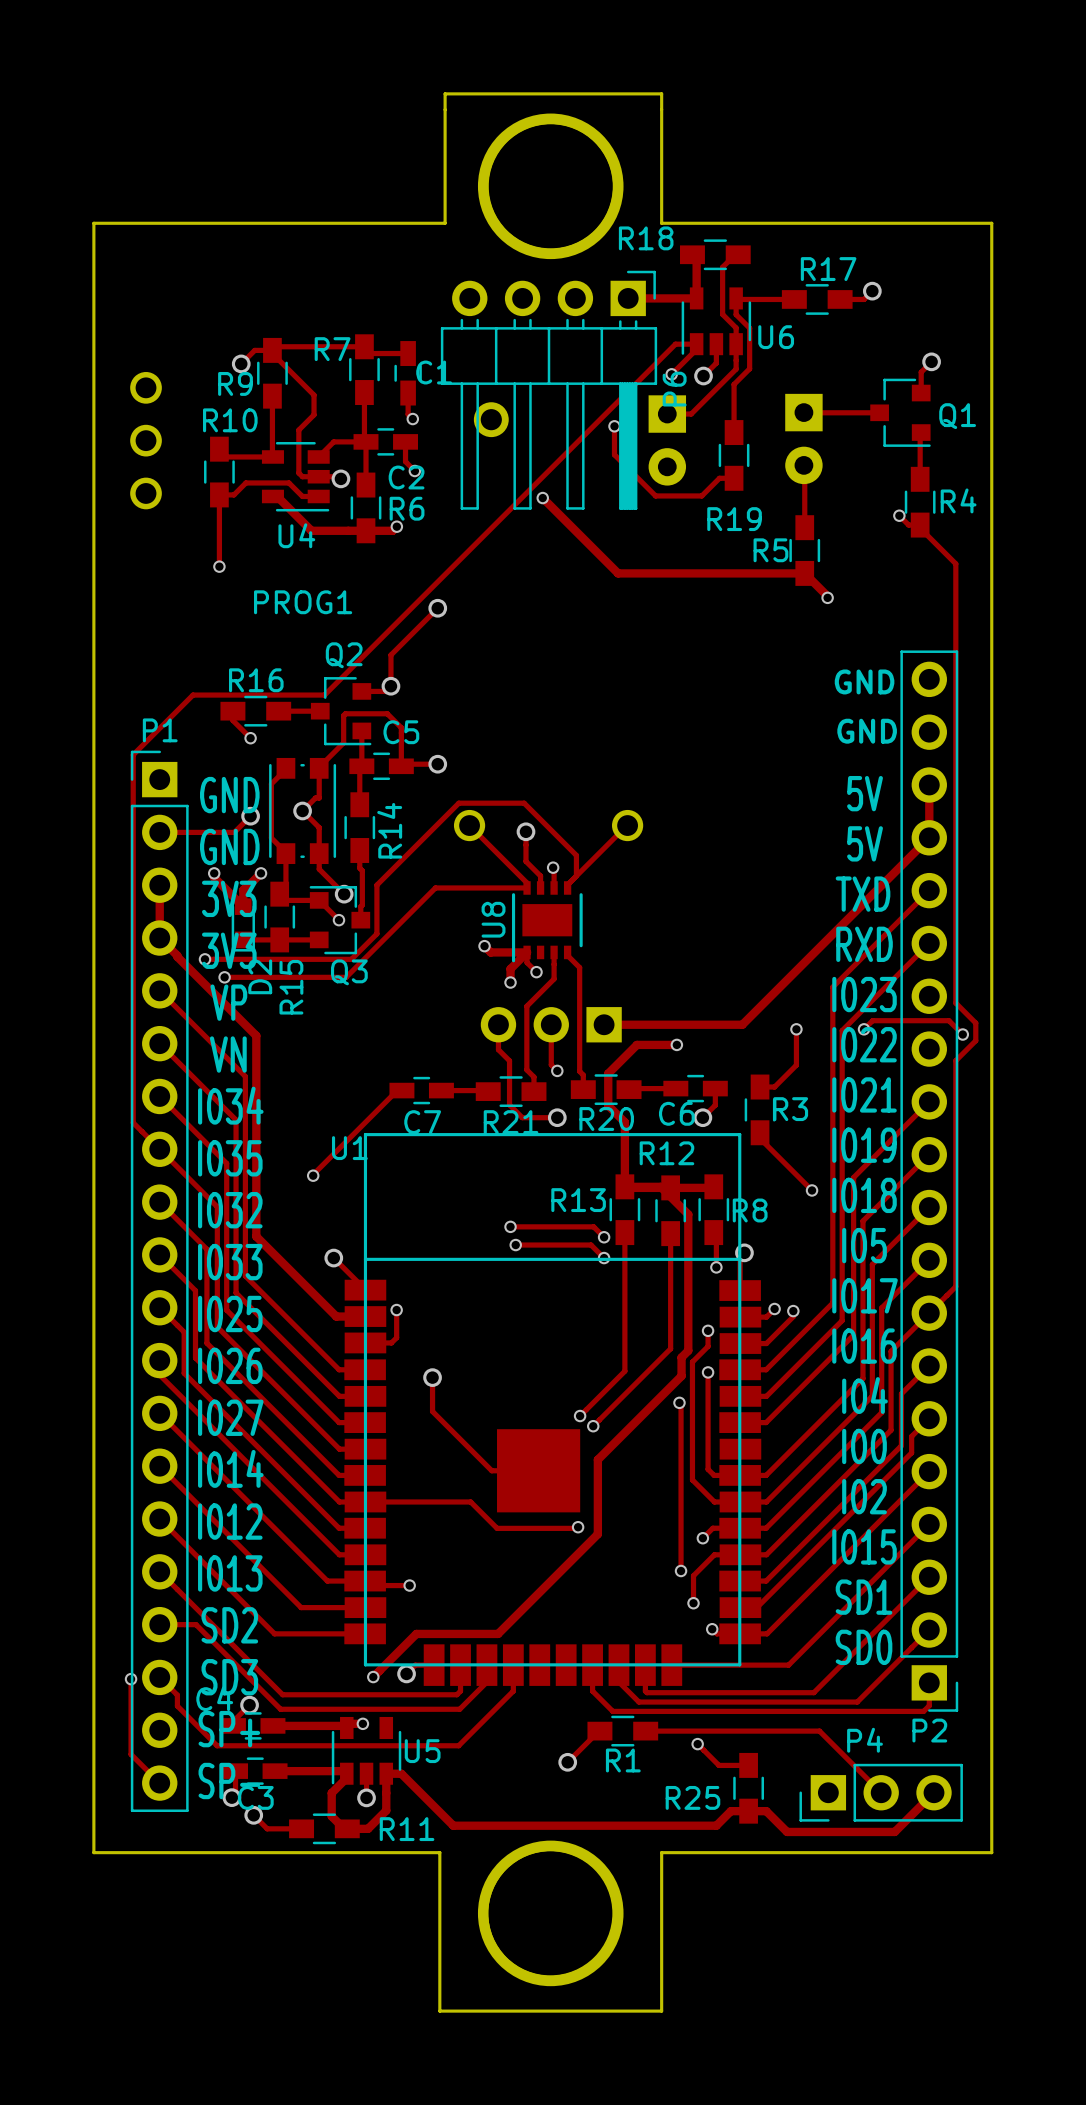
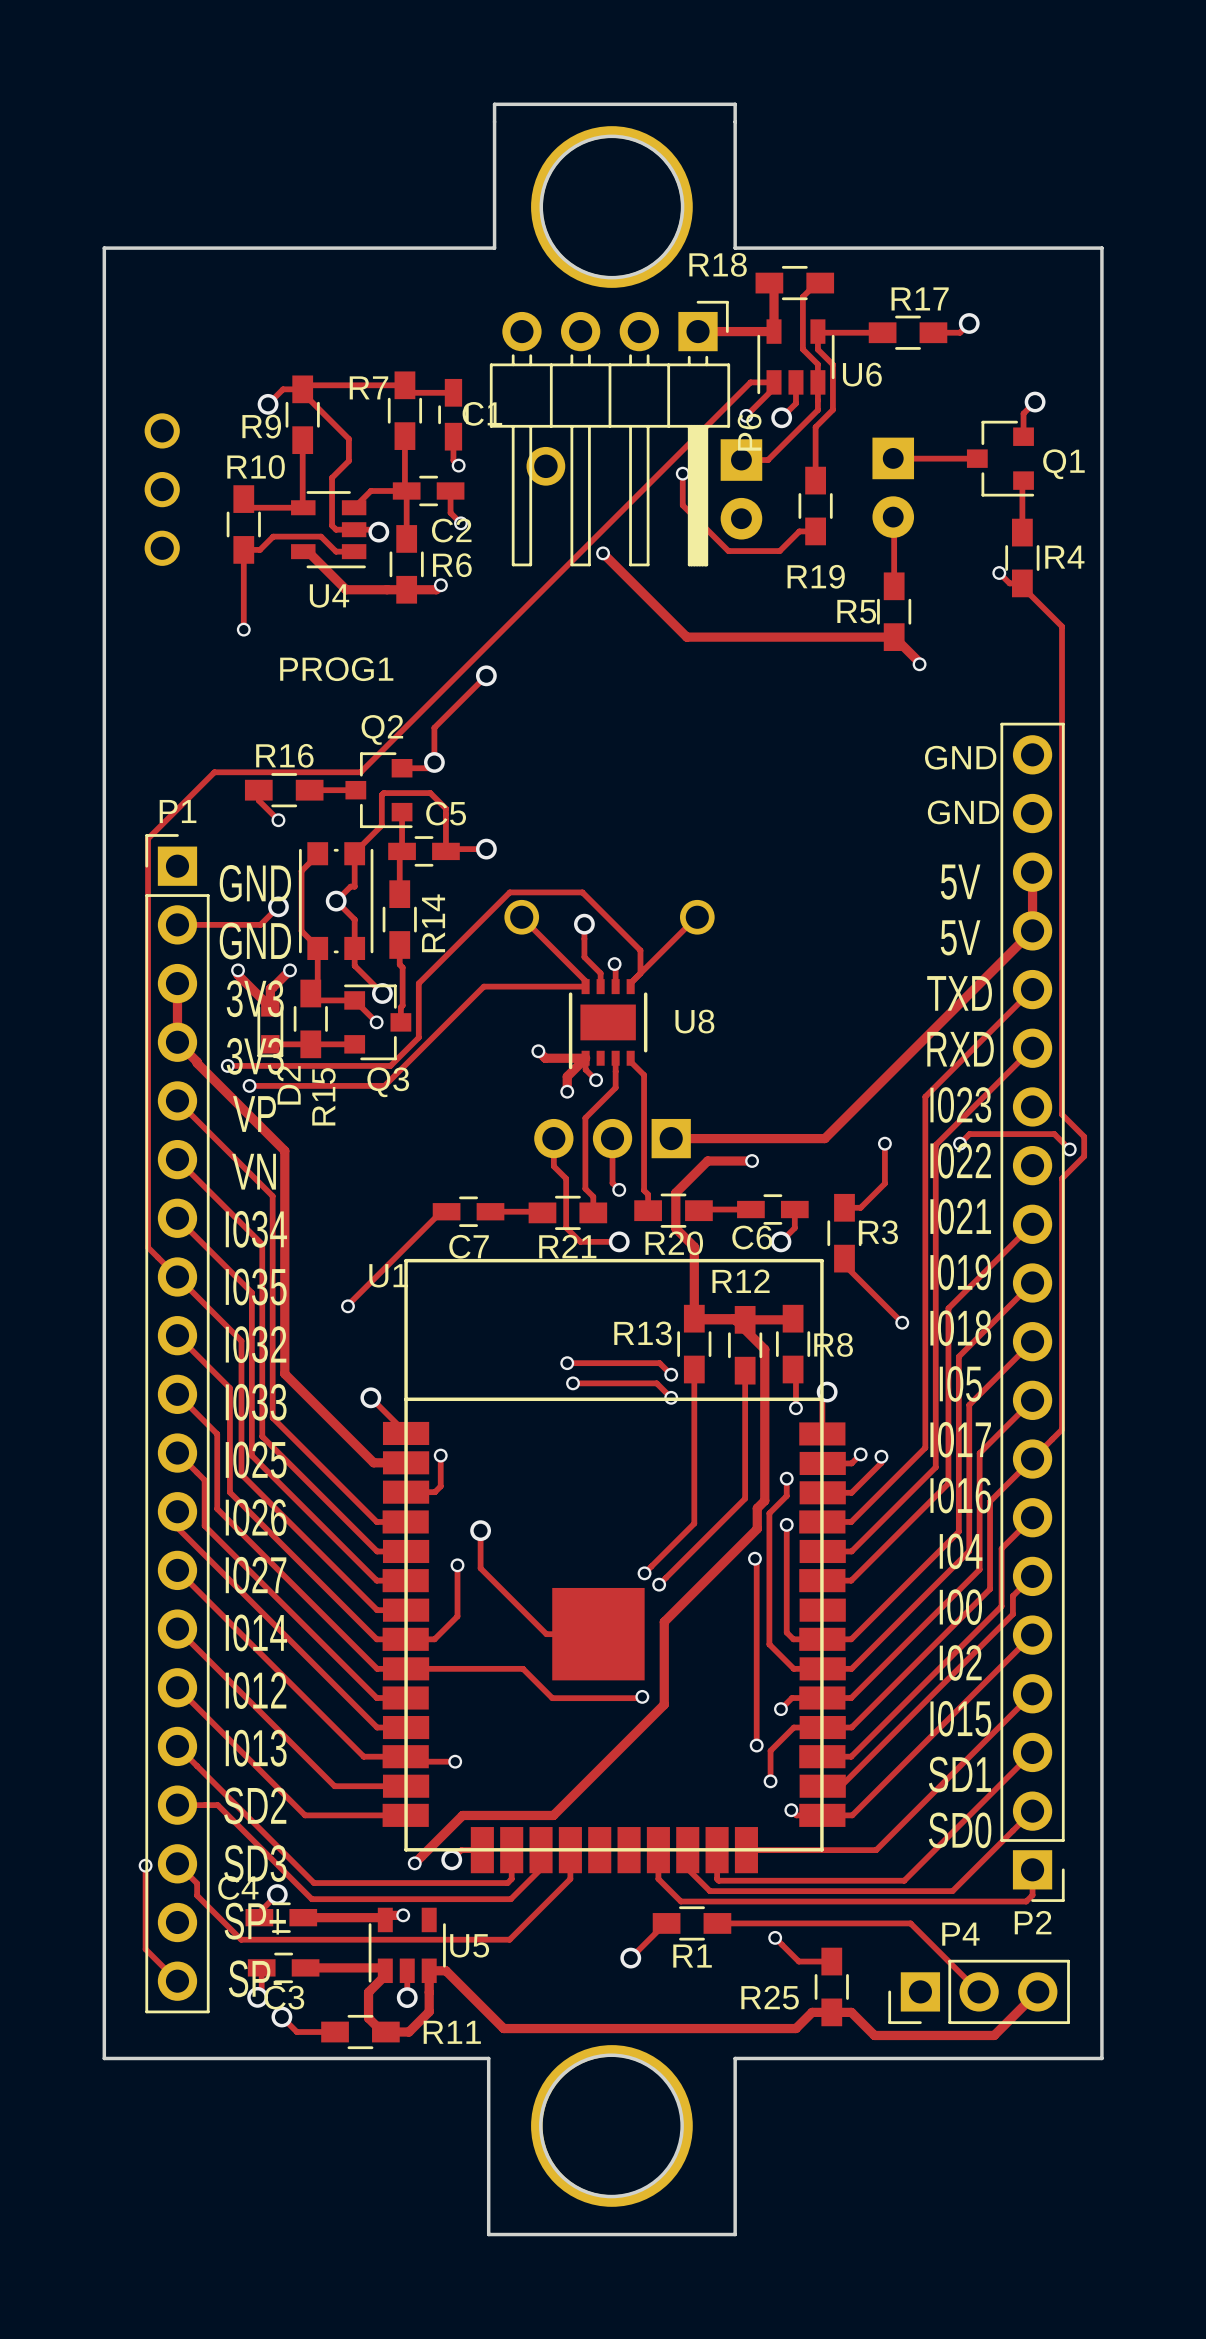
U8 name rotation: 0° (493, 919) -> 90° clockwise (694, 1021)
U8 name position: U8 (493, 919) -> U8 (694, 1021)
track: none -> (457, 1565) (457, 1616) (434, 1639) (405, 1639)
via: none -> (457, 1565)

